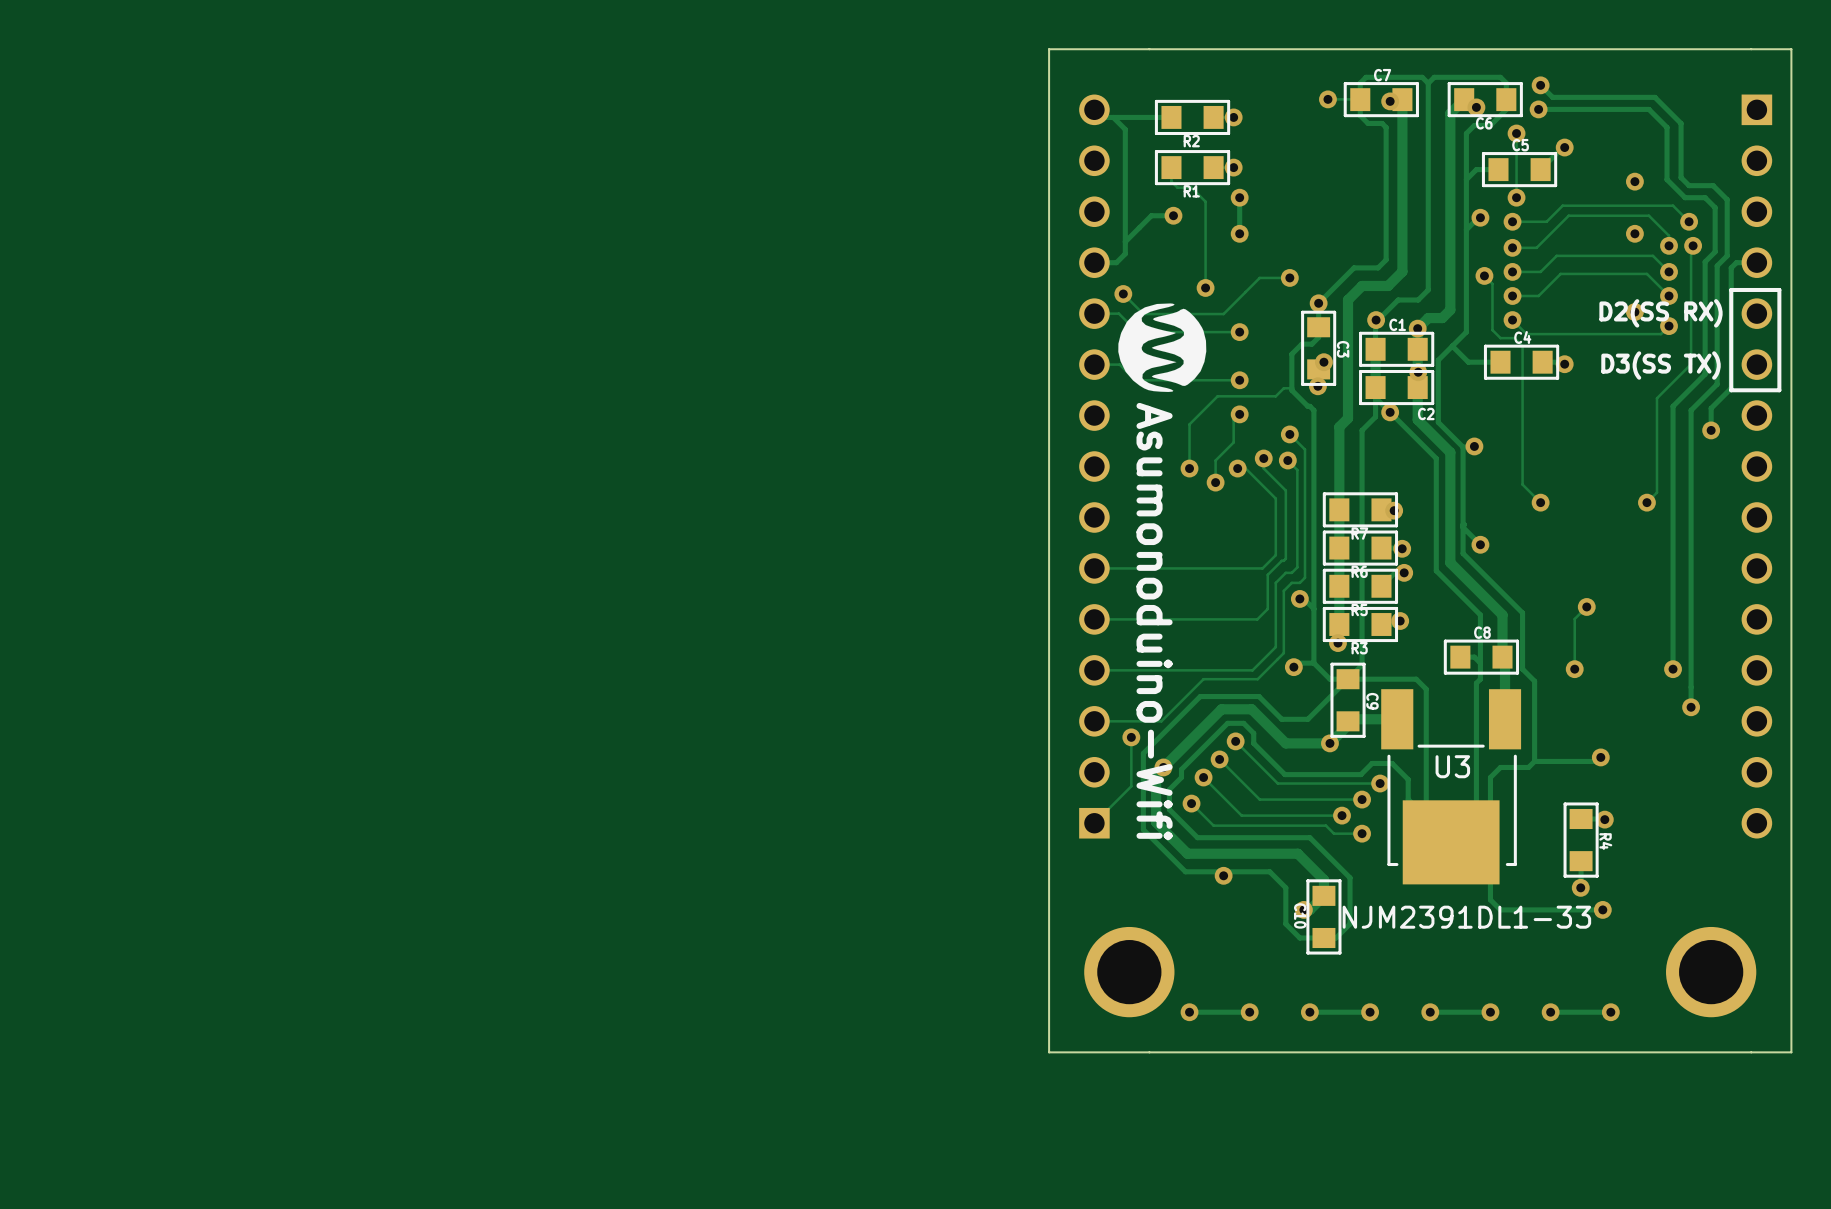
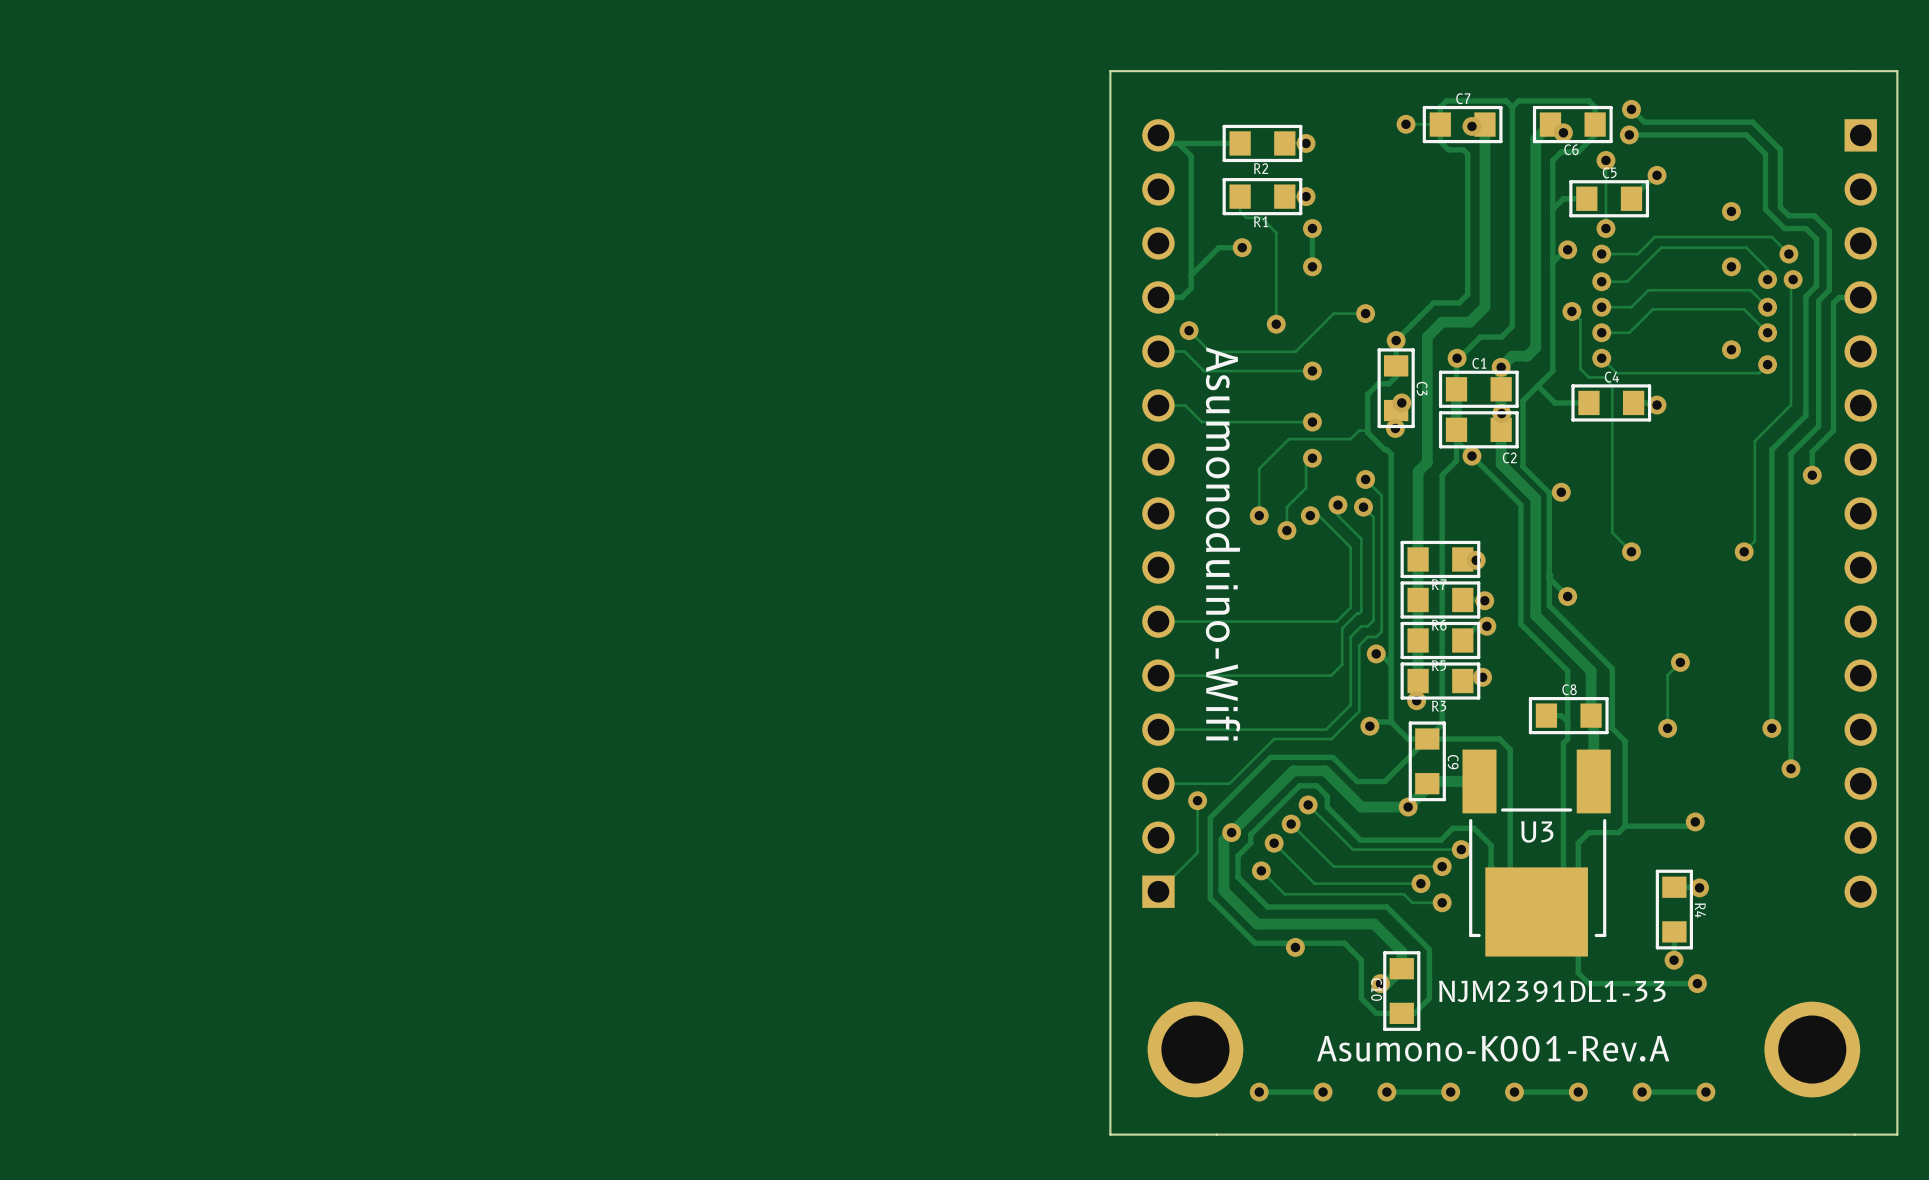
line: (1779, 289) (1779, 390) (1731, 390) (1731, 289) (1779, 289) -> none
drawing: [1118, 303, 1207, 392] -> none
text: D2(SS RX) (1661, 313) -> none
text: D3(SS TX) (1661, 365) -> none
text position: Asumonoduino-Wifi (1154, 621) -> Asumonoduino-Wifi (1223, 543)
text: none -> Asumono-K001-Rev.A (1493, 1048)

